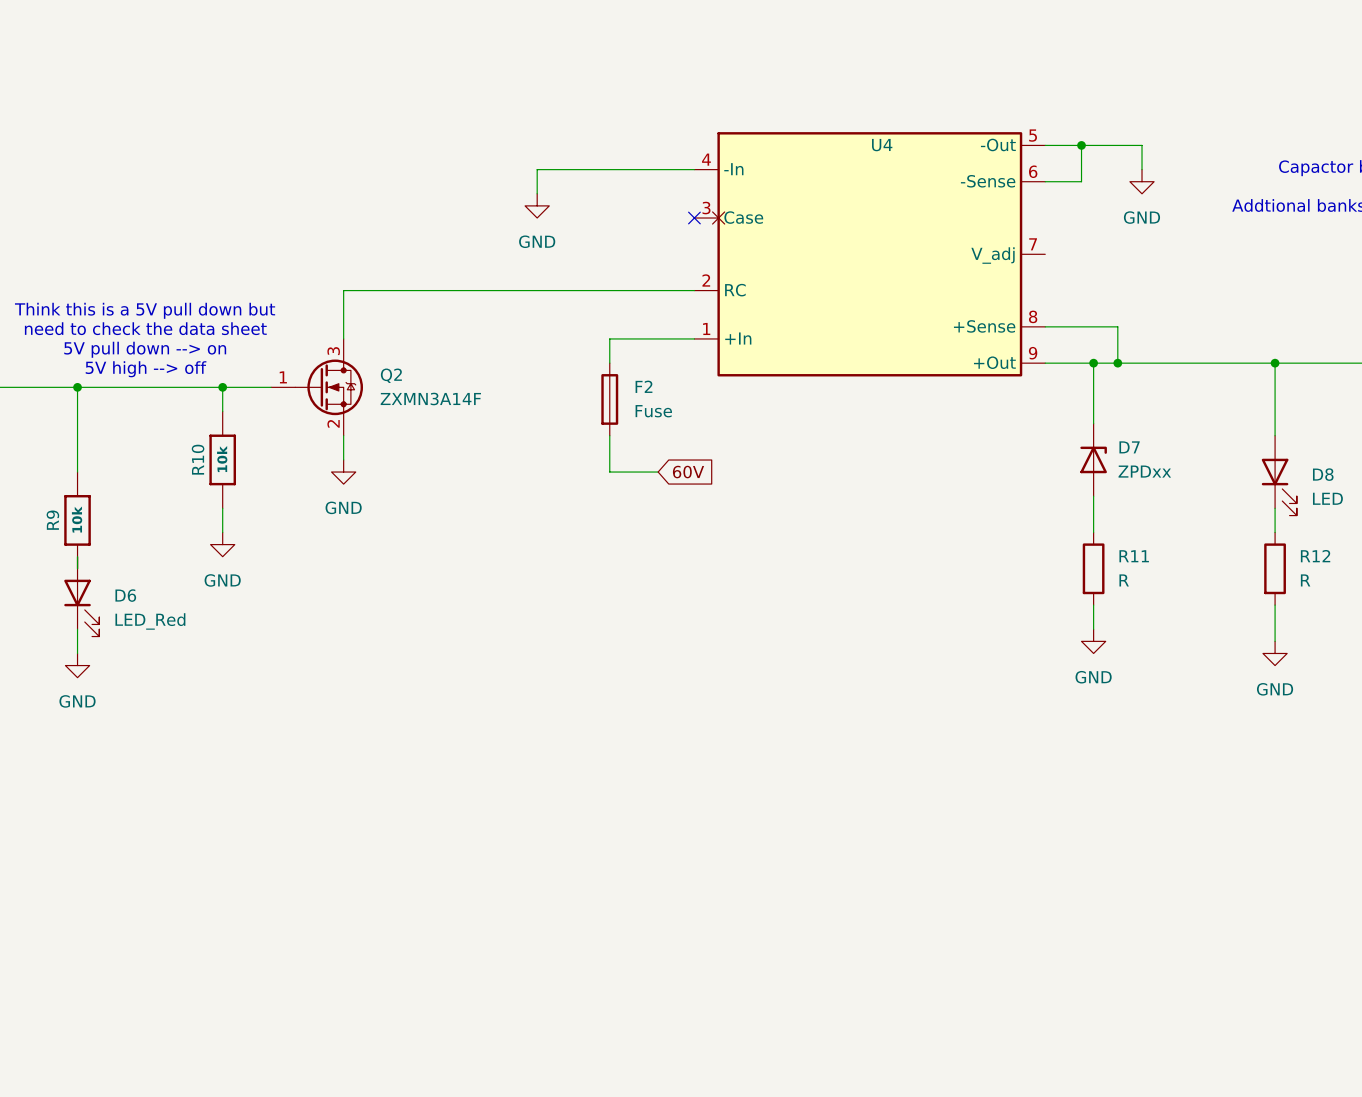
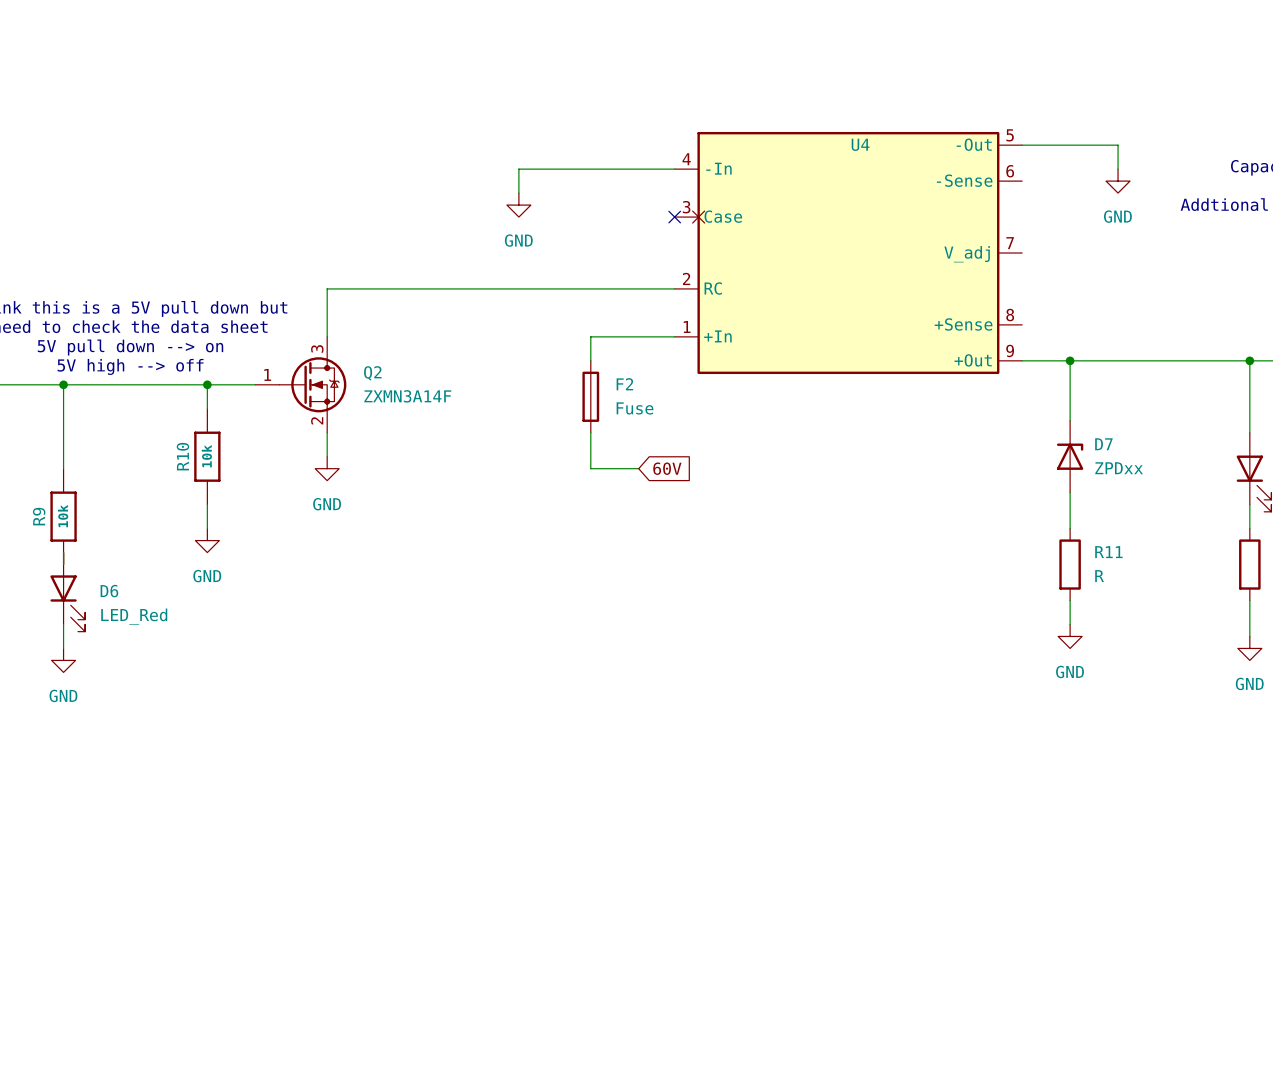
wire: (1081, 145) (1081, 181) (1045, 181) -> none
junction: (1081, 145) -> none
wire: (1045, 326) (1117, 326) (1117, 363) -> none
junction: (1117, 363) -> none

